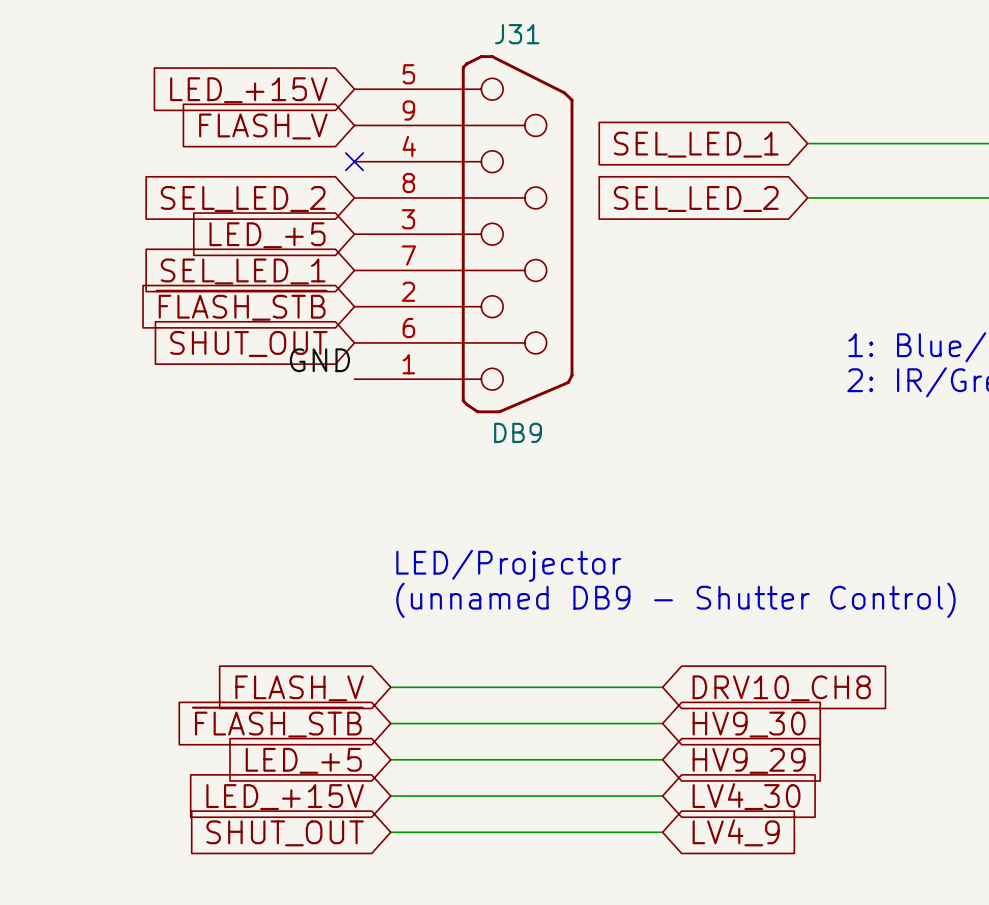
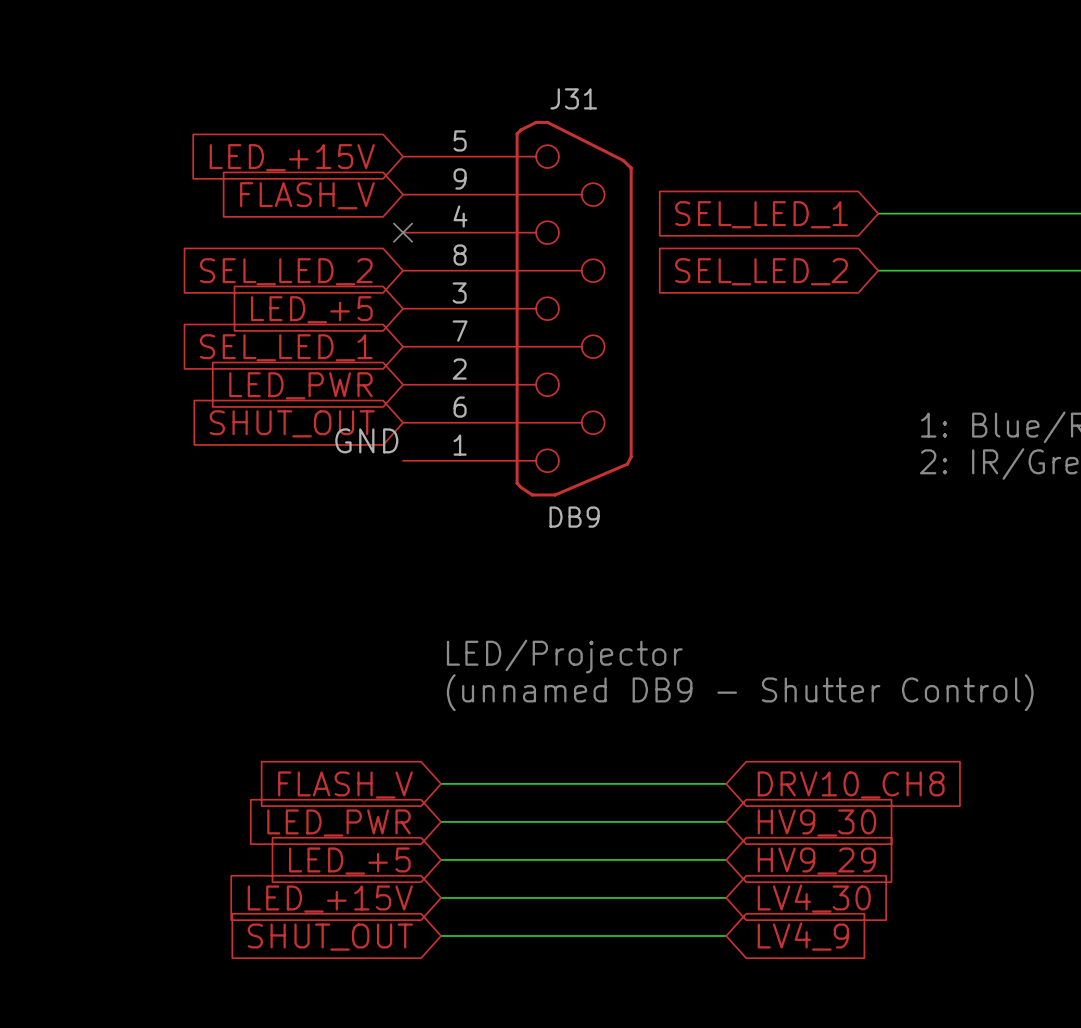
global label: ~{FLASH_STB} (241, 305) -> LED_PWR (300, 385)
global label: ~{FLASH_STB} (277, 722) -> LED_PWR (338, 823)

